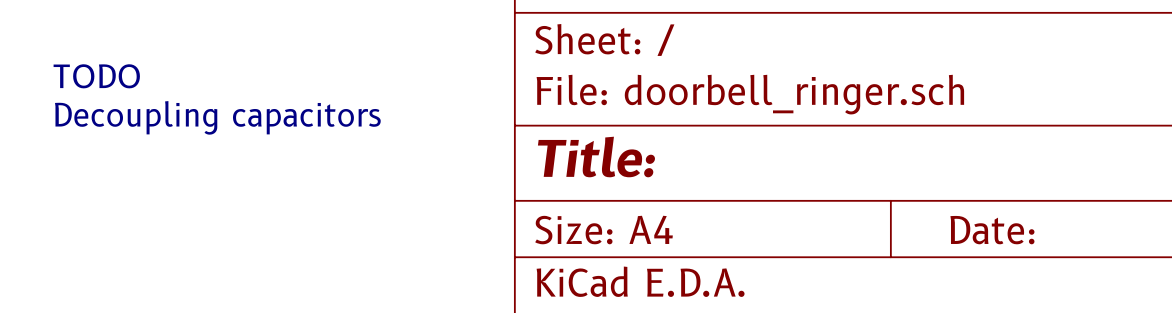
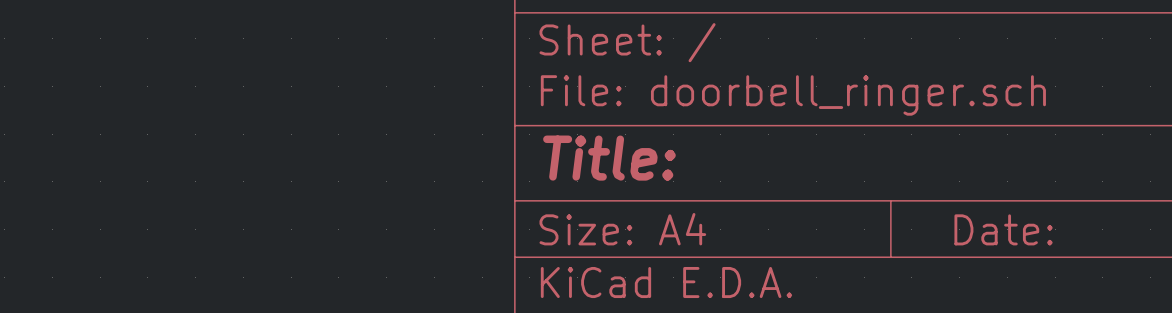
text: TODO (96, 76) -> none
text: Decoupling capacitors (217, 117) -> none

